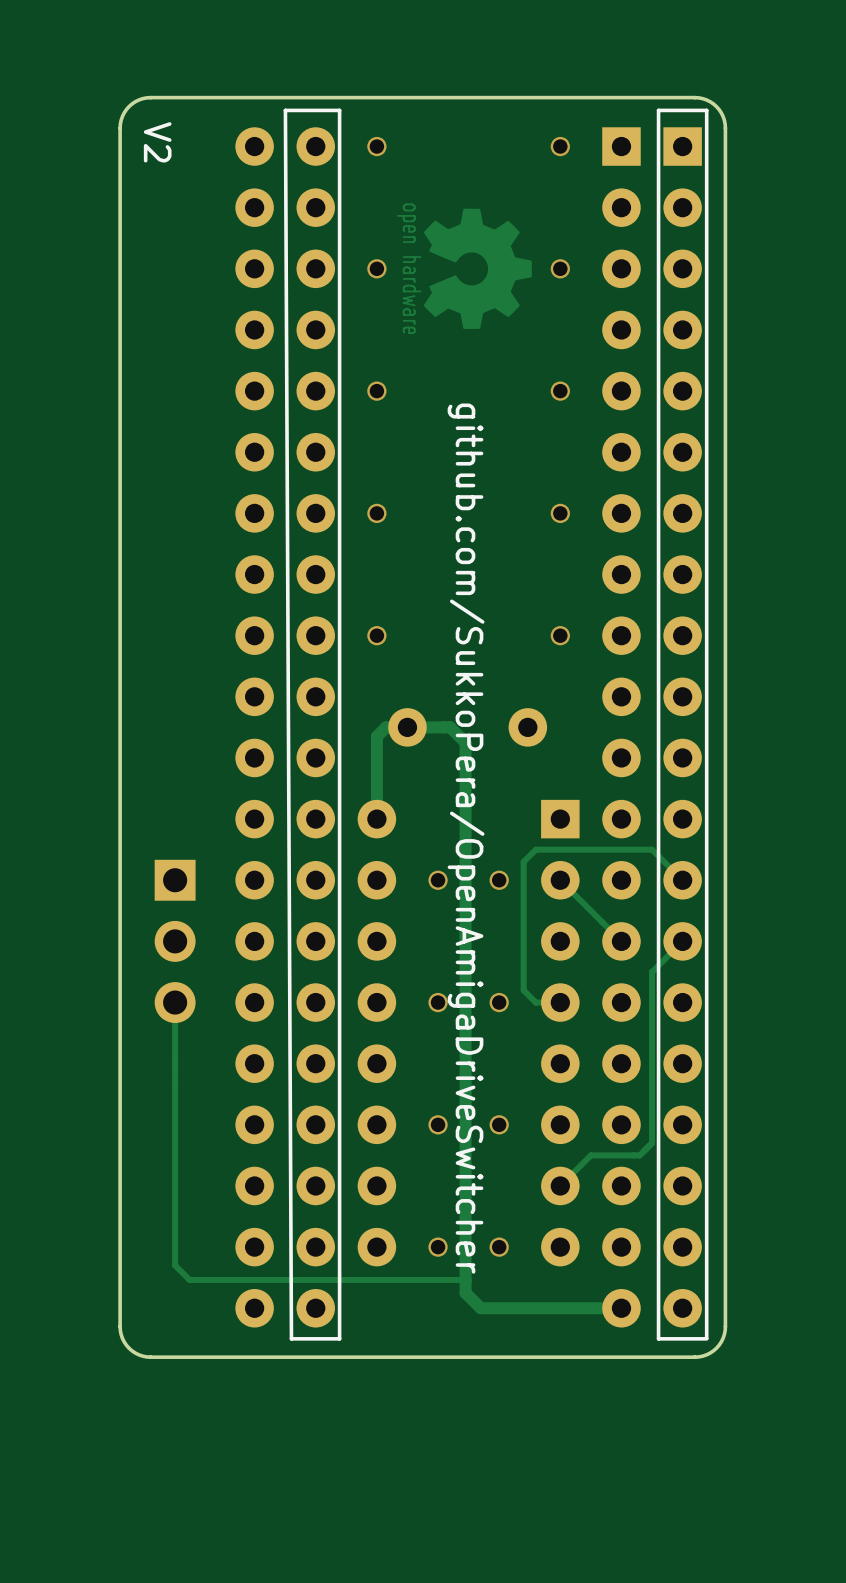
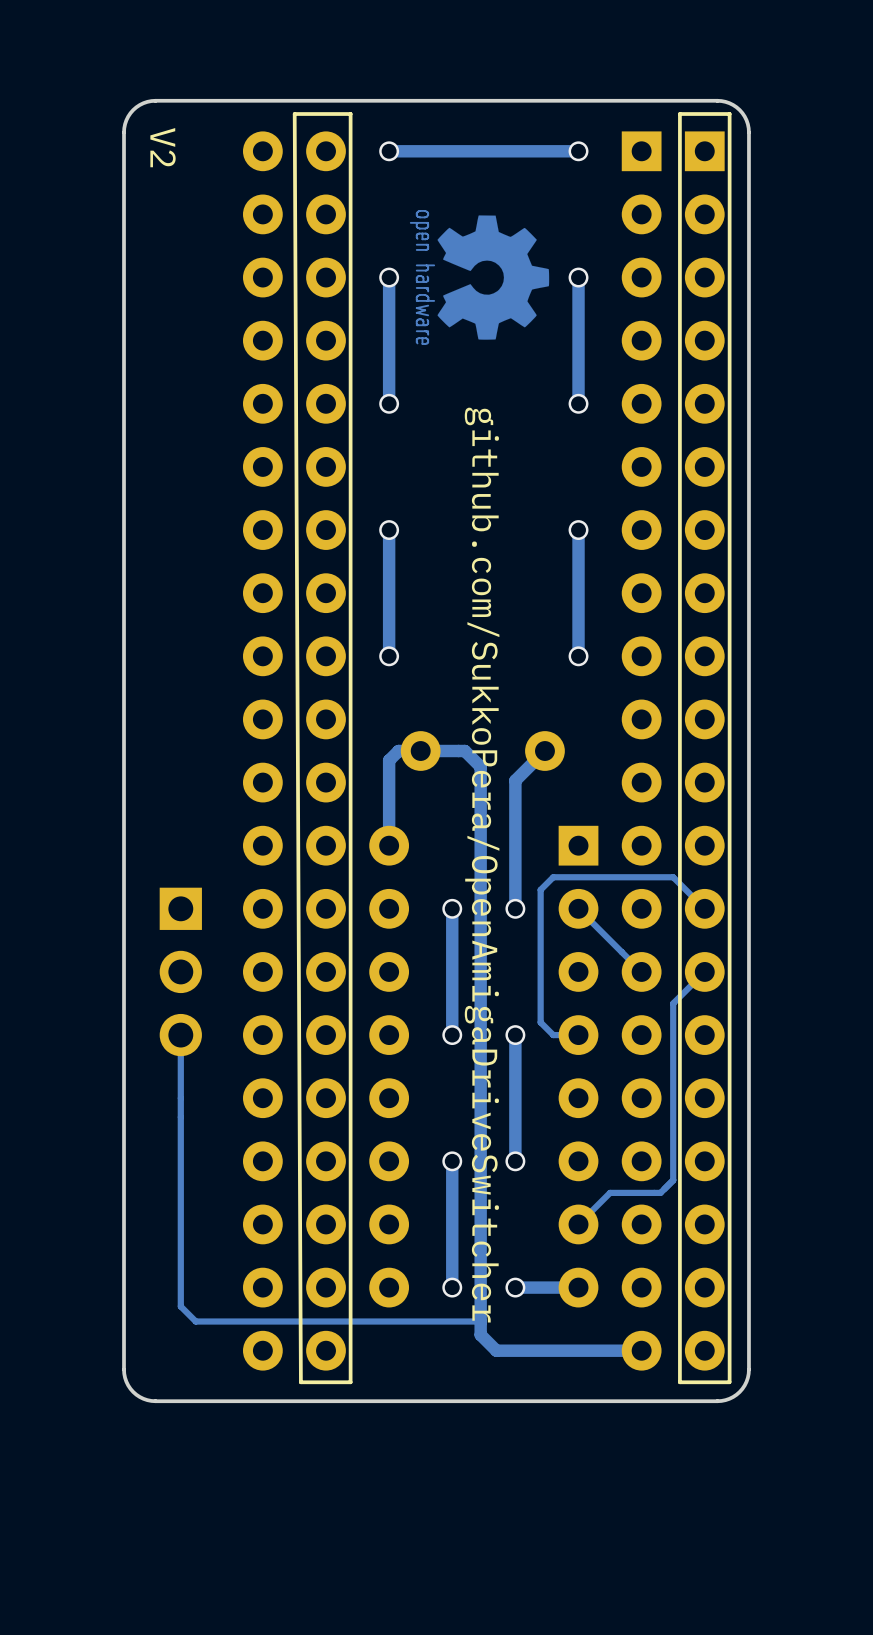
track: none -> (578, 151) (389, 151)
track: none -> (389, 277) (389, 403)
track: none -> (578, 277) (578, 403)
track: none -> (389, 530) (389, 653)
track: none -> (578, 530) (578, 656)
track: none -> (544, 751) (515, 780) (515, 908)
track: none -> (452, 908) (452, 1035)
track: none -> (515, 1035) (515, 1161)
track: none -> (452, 1161) (452, 1287)
track: none -> (578, 1287) (515, 1287)

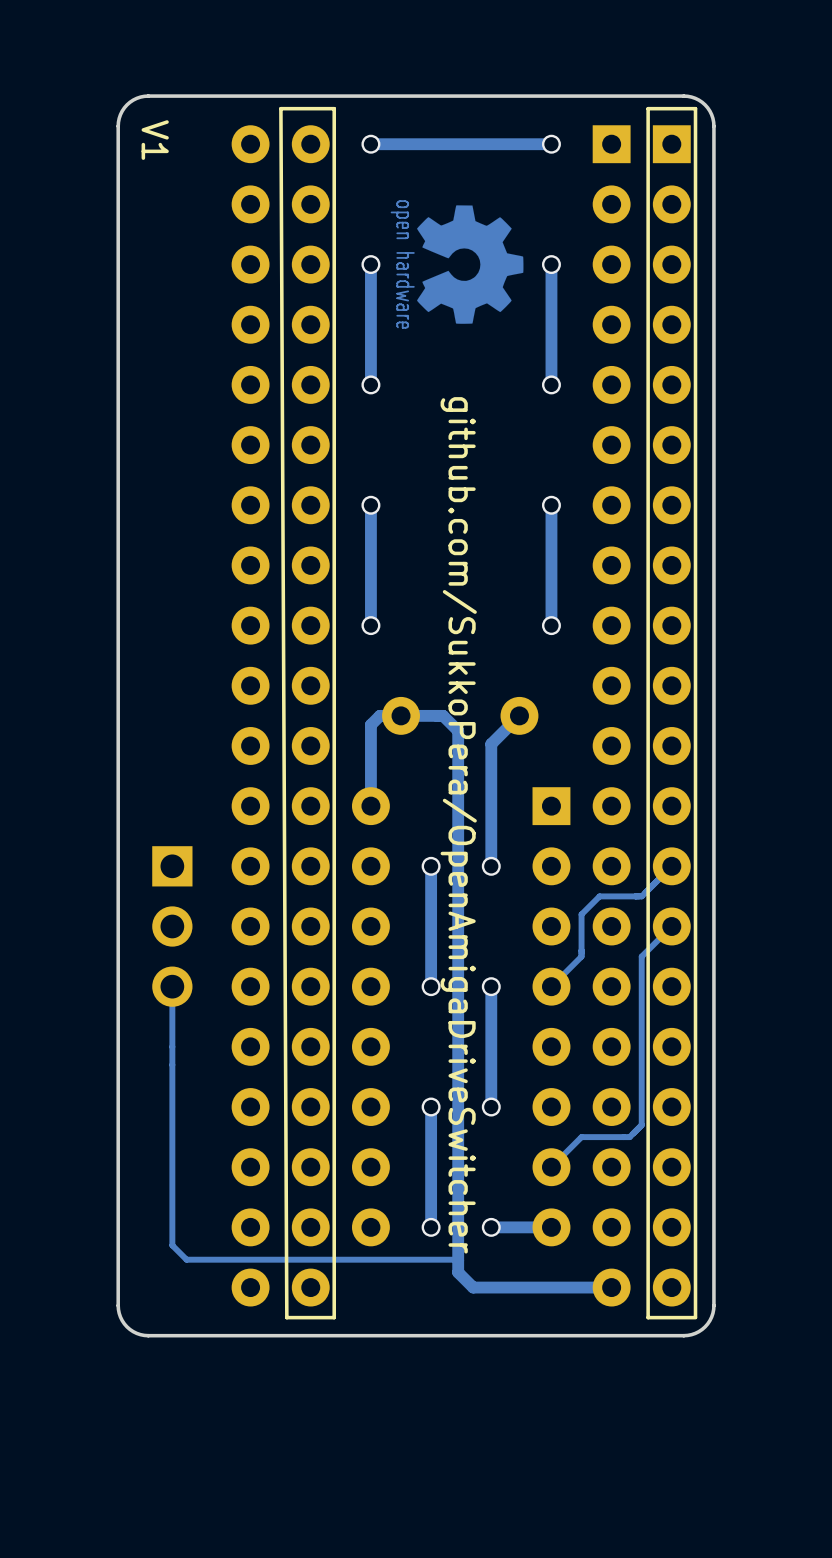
text: V2 (163, 147) -> V1 (155, 140)
track: (578, 908) (641, 971) -> none
track: (704, 908) (673, 877) (553, 877) (540, 889) (540, 1022) (553, 1035) (578, 1035) -> (671, 866) (641, 896) (599, 896) (581, 914) (581, 956) (551, 986)

